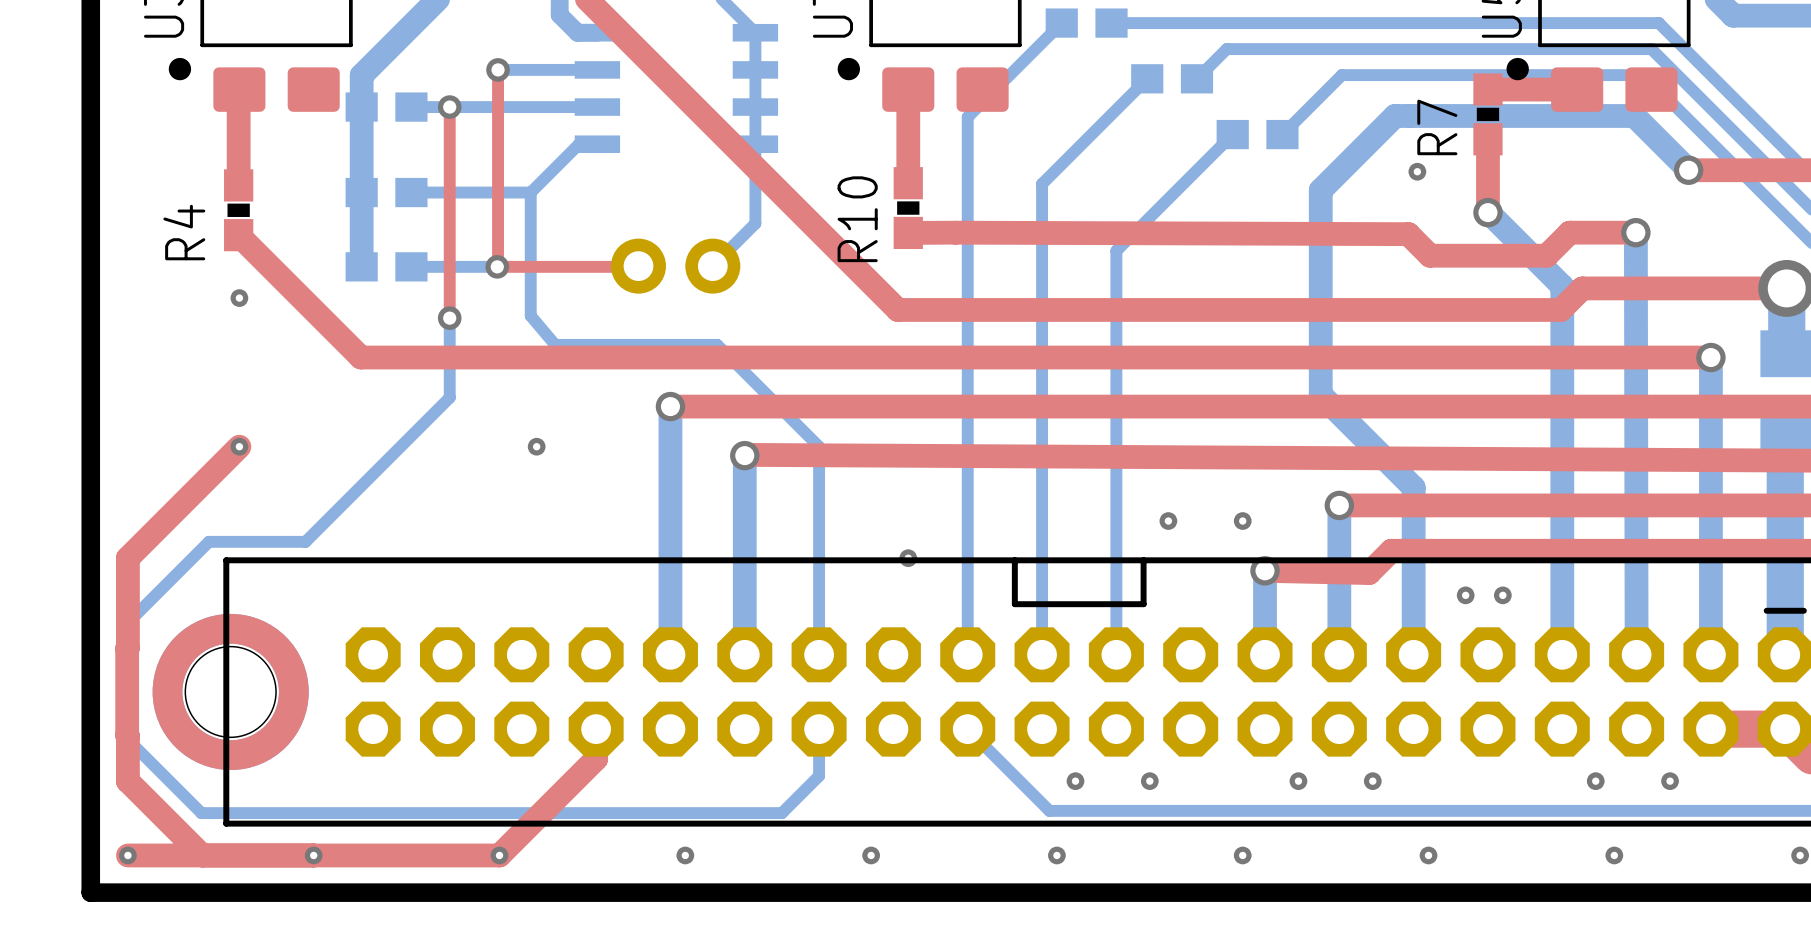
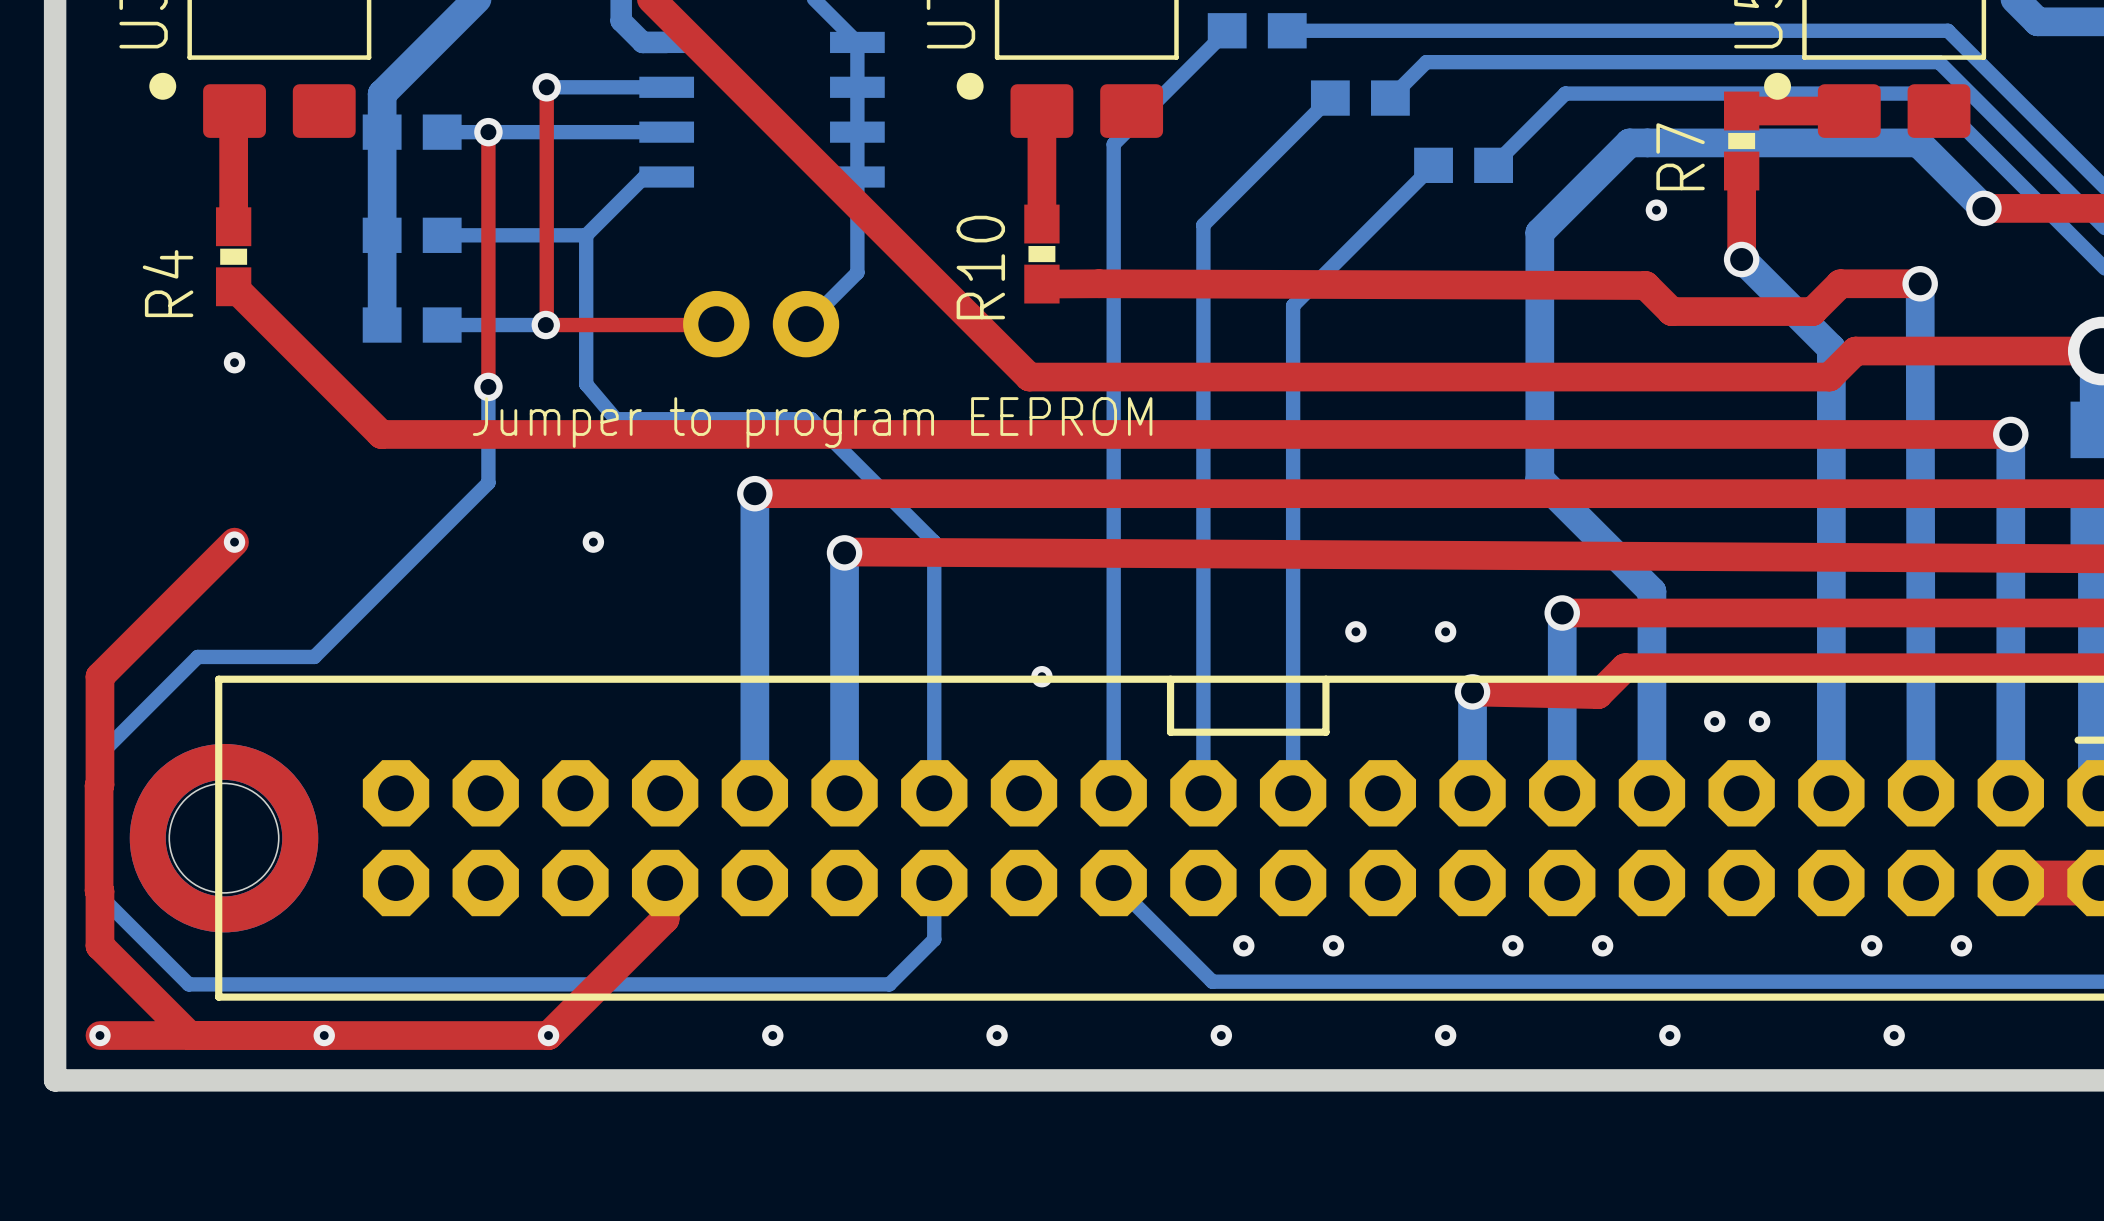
text: none -> Jumper to program EEPROM (812, 422)

